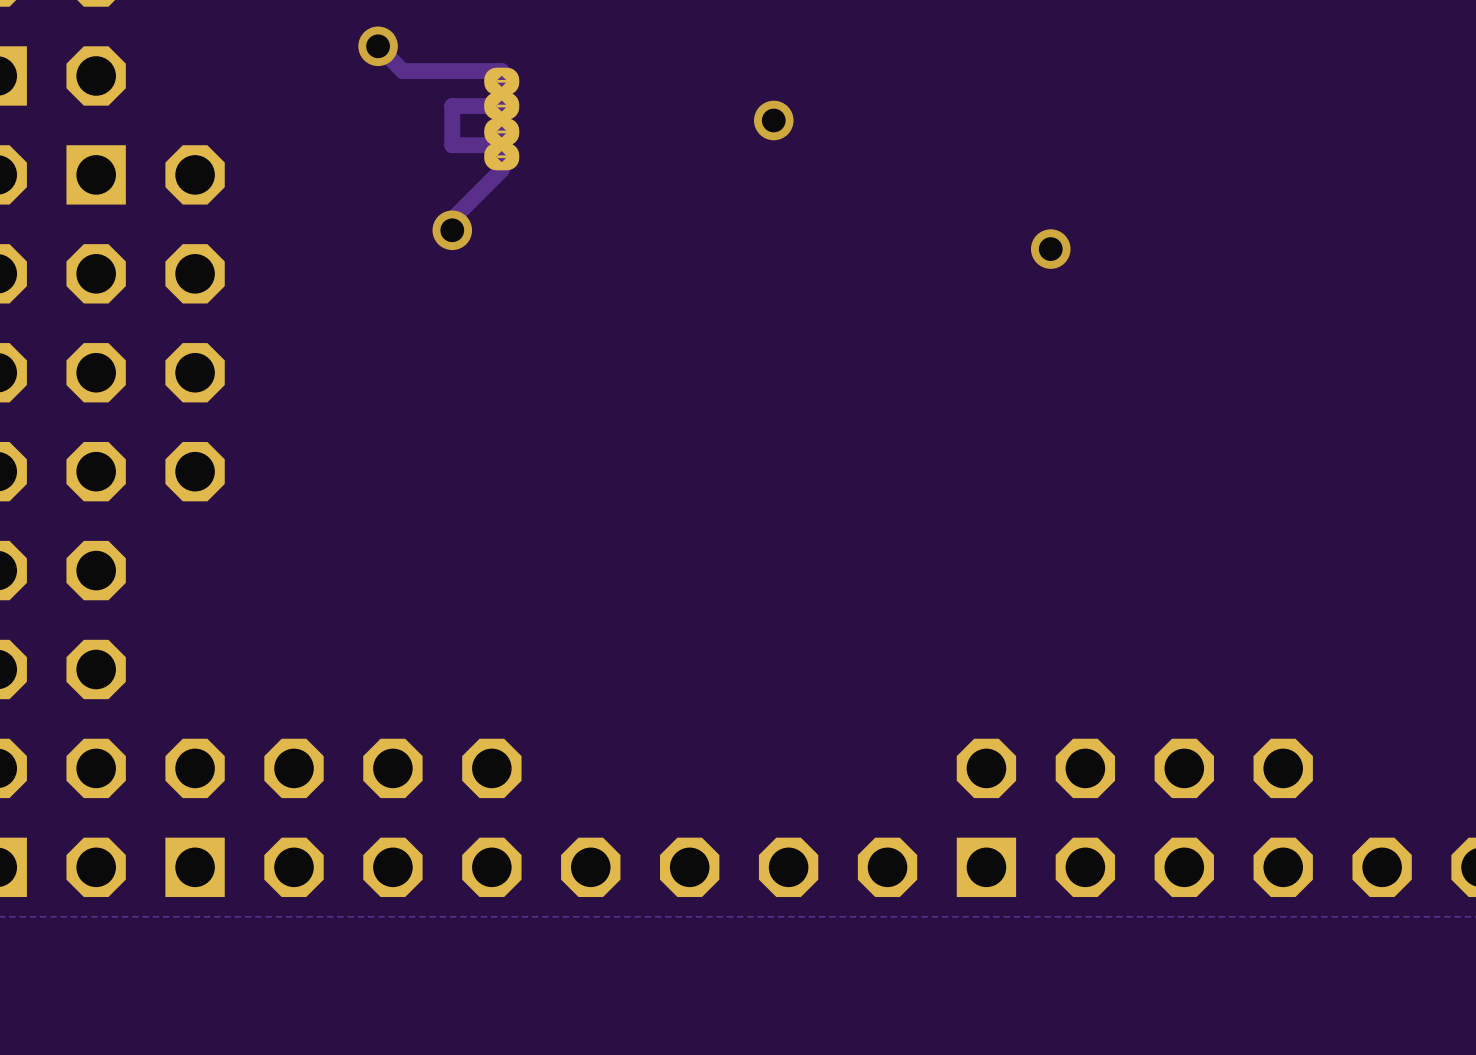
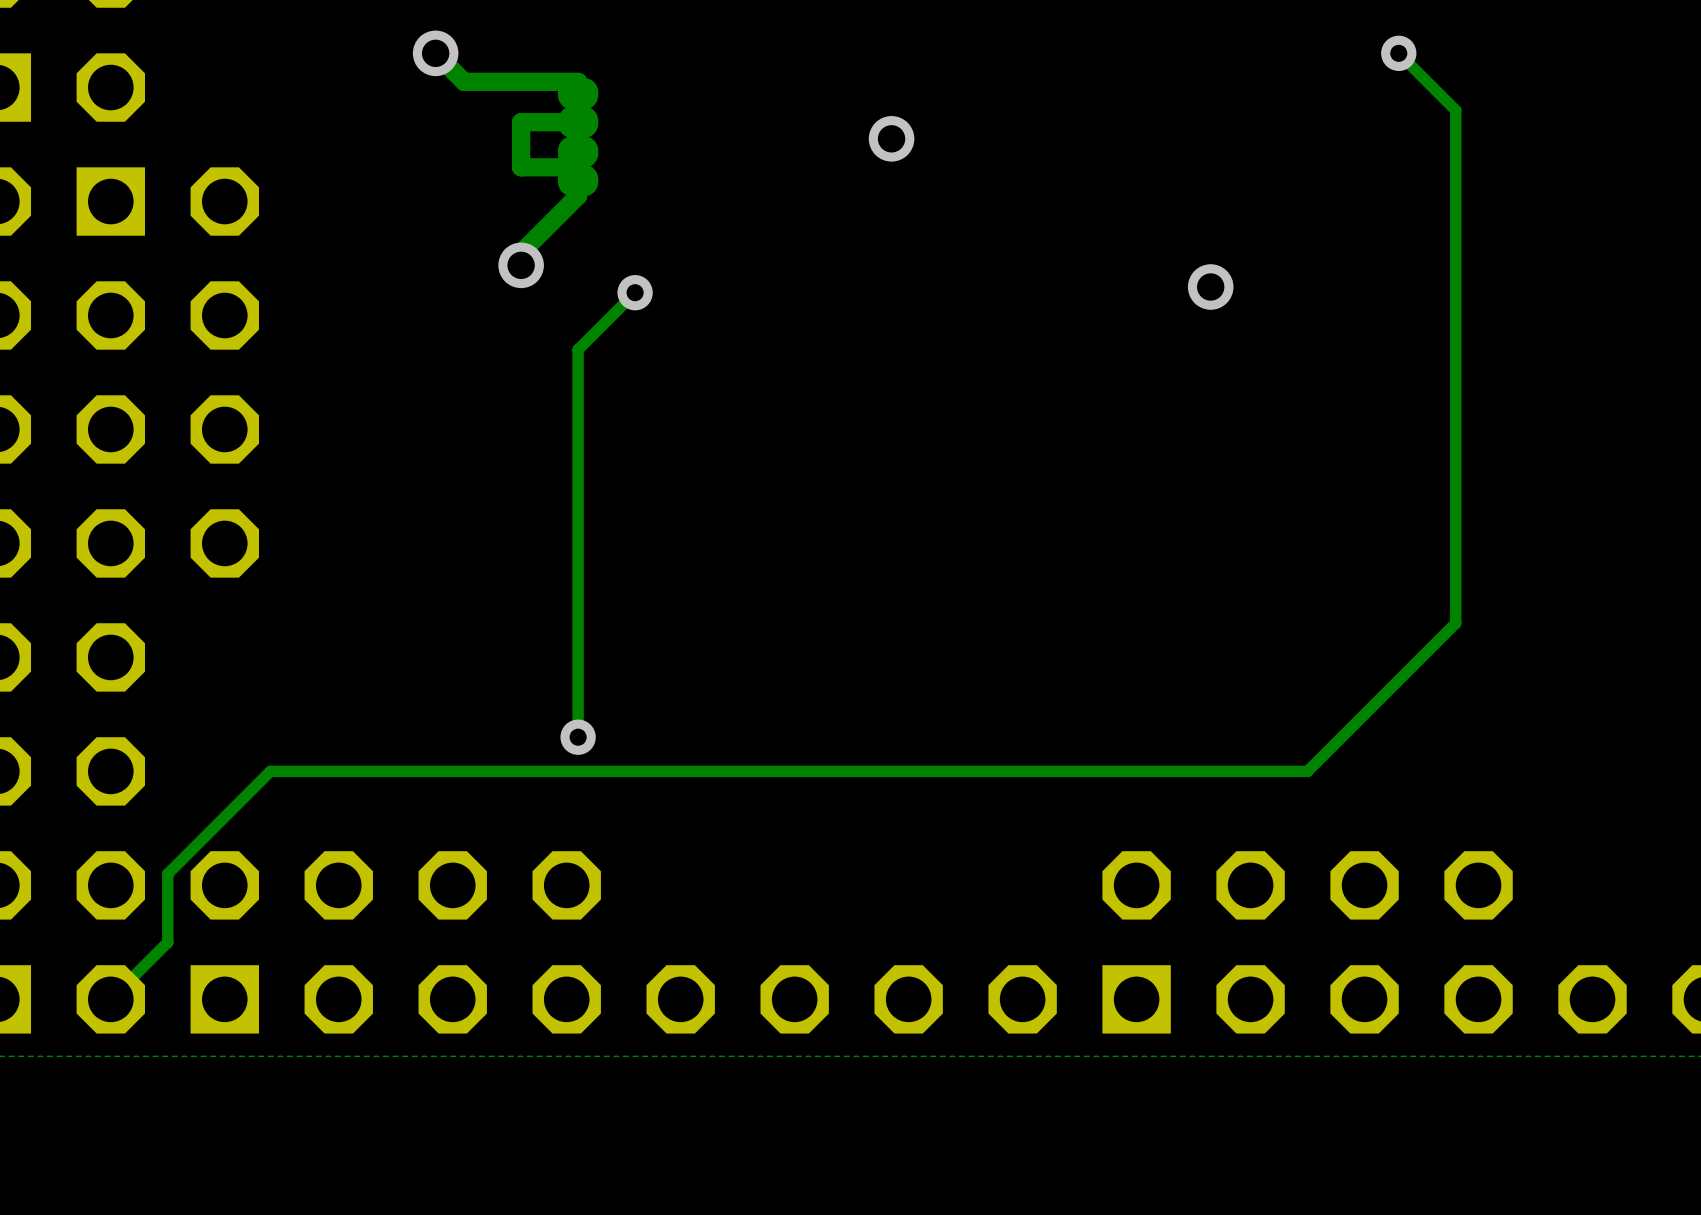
track: none -> (1398, 53) (1455, 110) (1455, 623) (1307, 771) (270, 771) (167, 873) (167, 942) (110, 999)
via: none -> (1398, 53)
track: none -> (635, 292) (578, 349) (578, 737)
via: none -> (635, 292)
via: none -> (578, 737)

